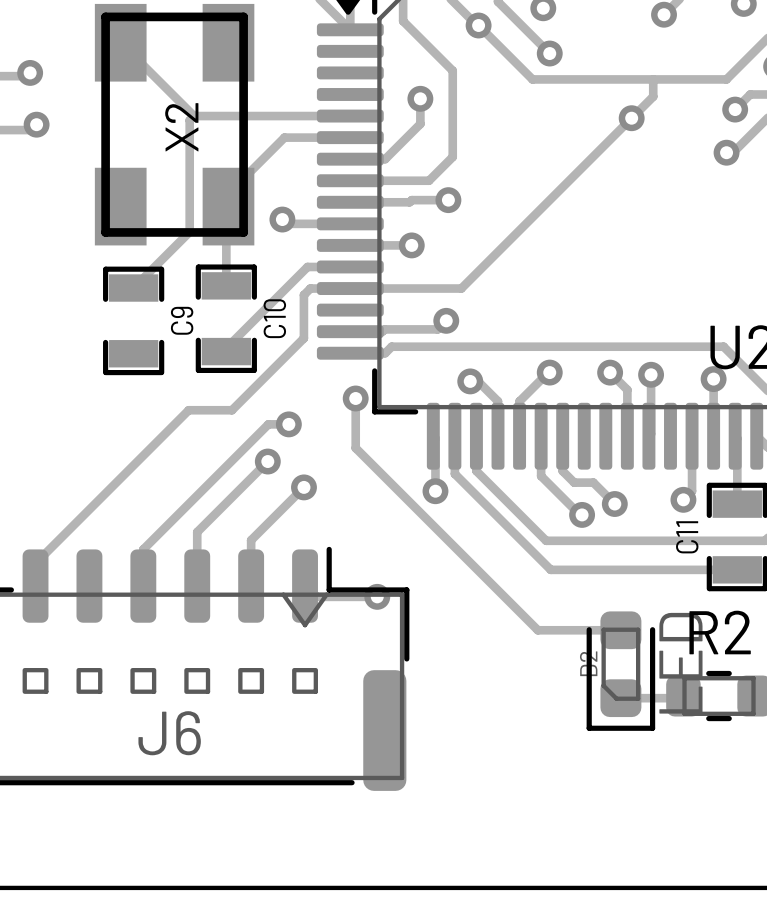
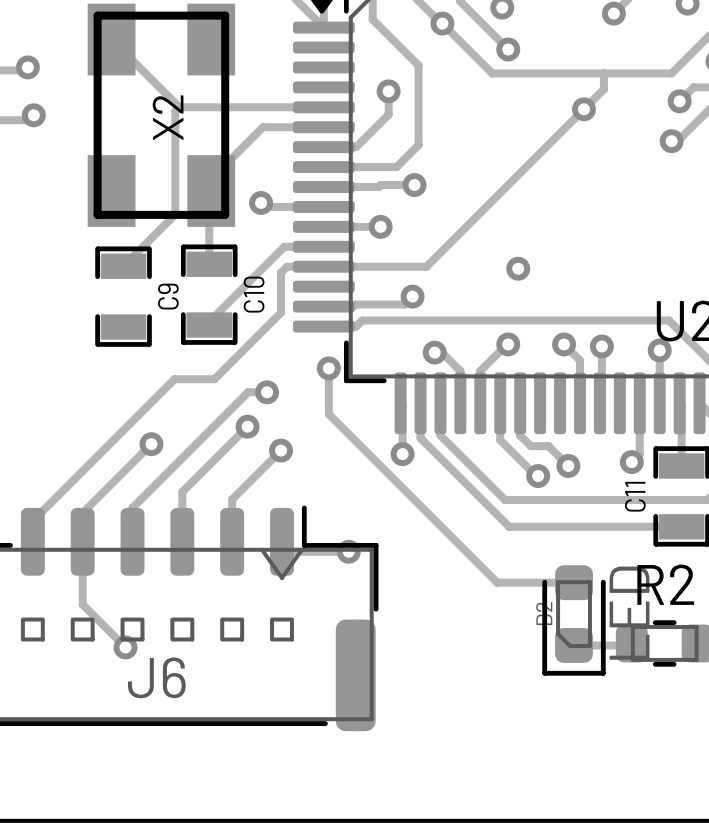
via: none -> (518, 268)
track: none -> (151, 444) (82, 512) (82, 604) (125, 647)
via: none -> (151, 444)
via: none -> (125, 647)

